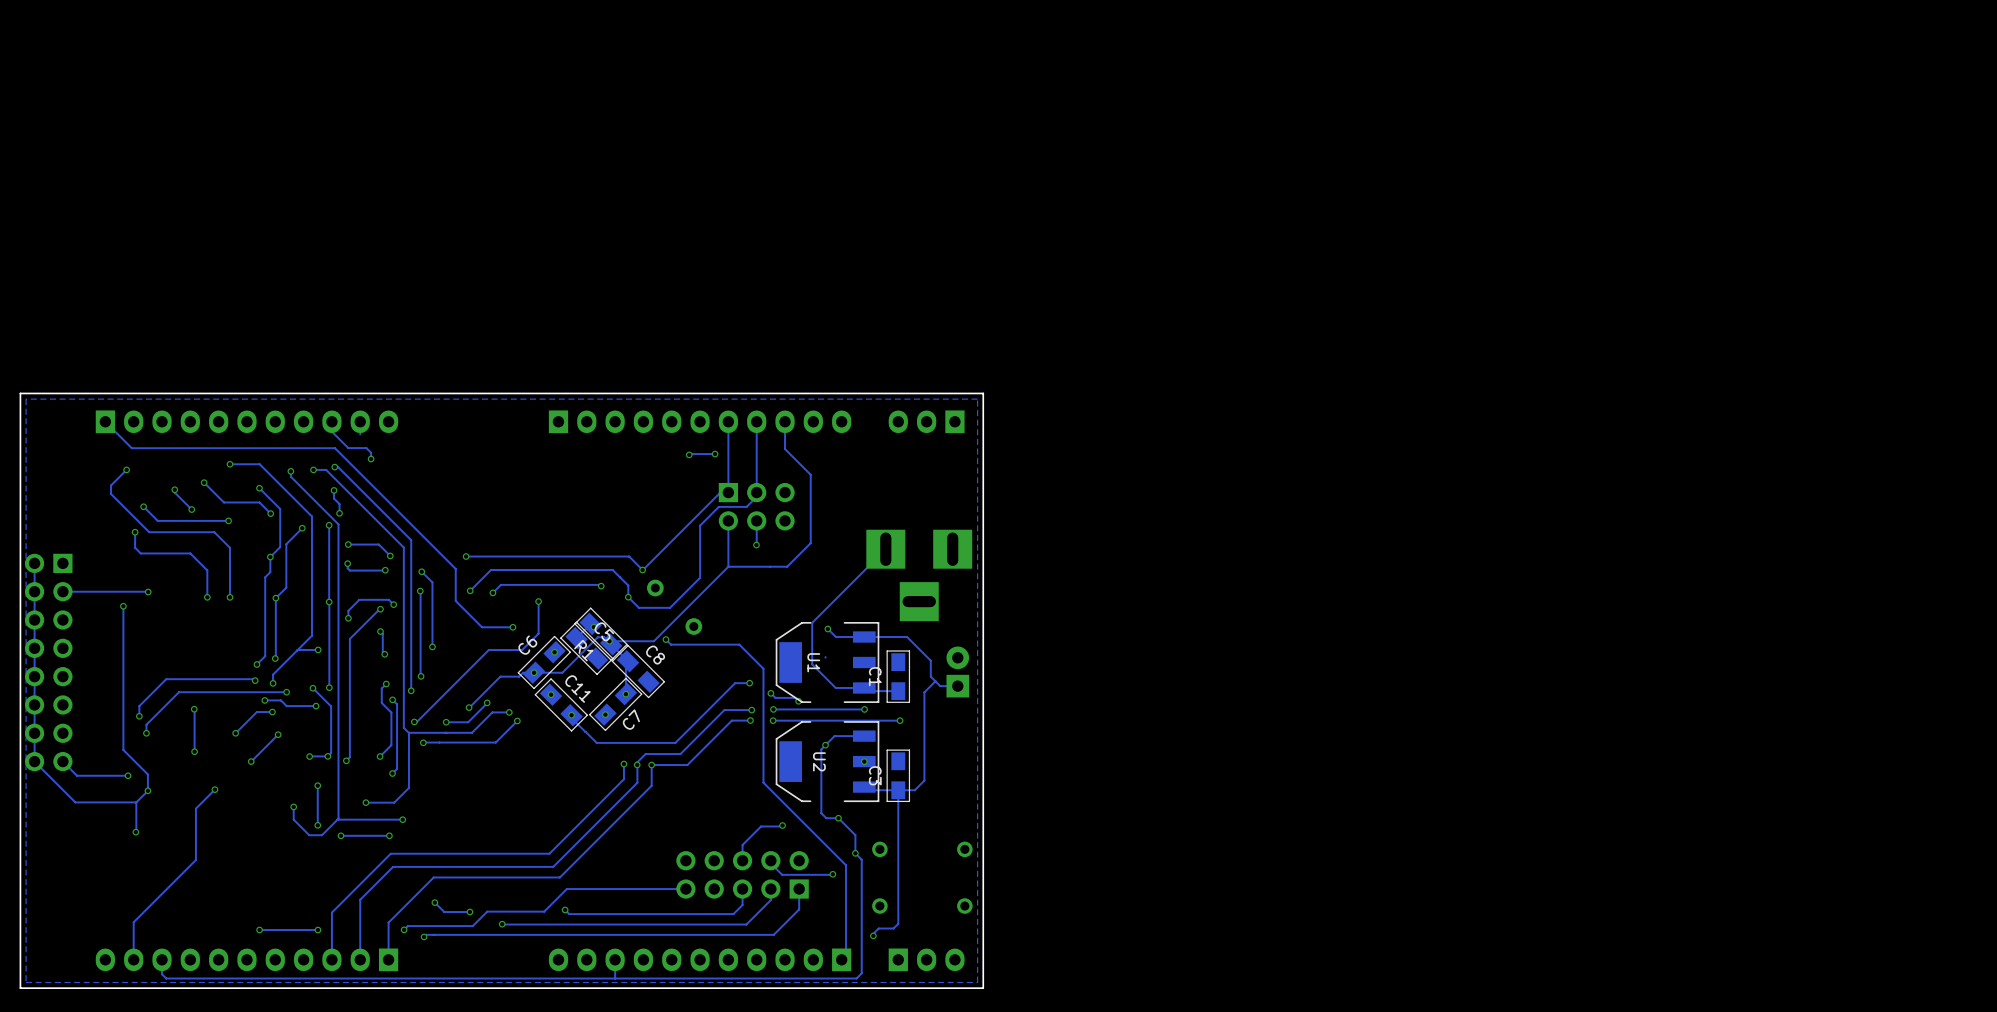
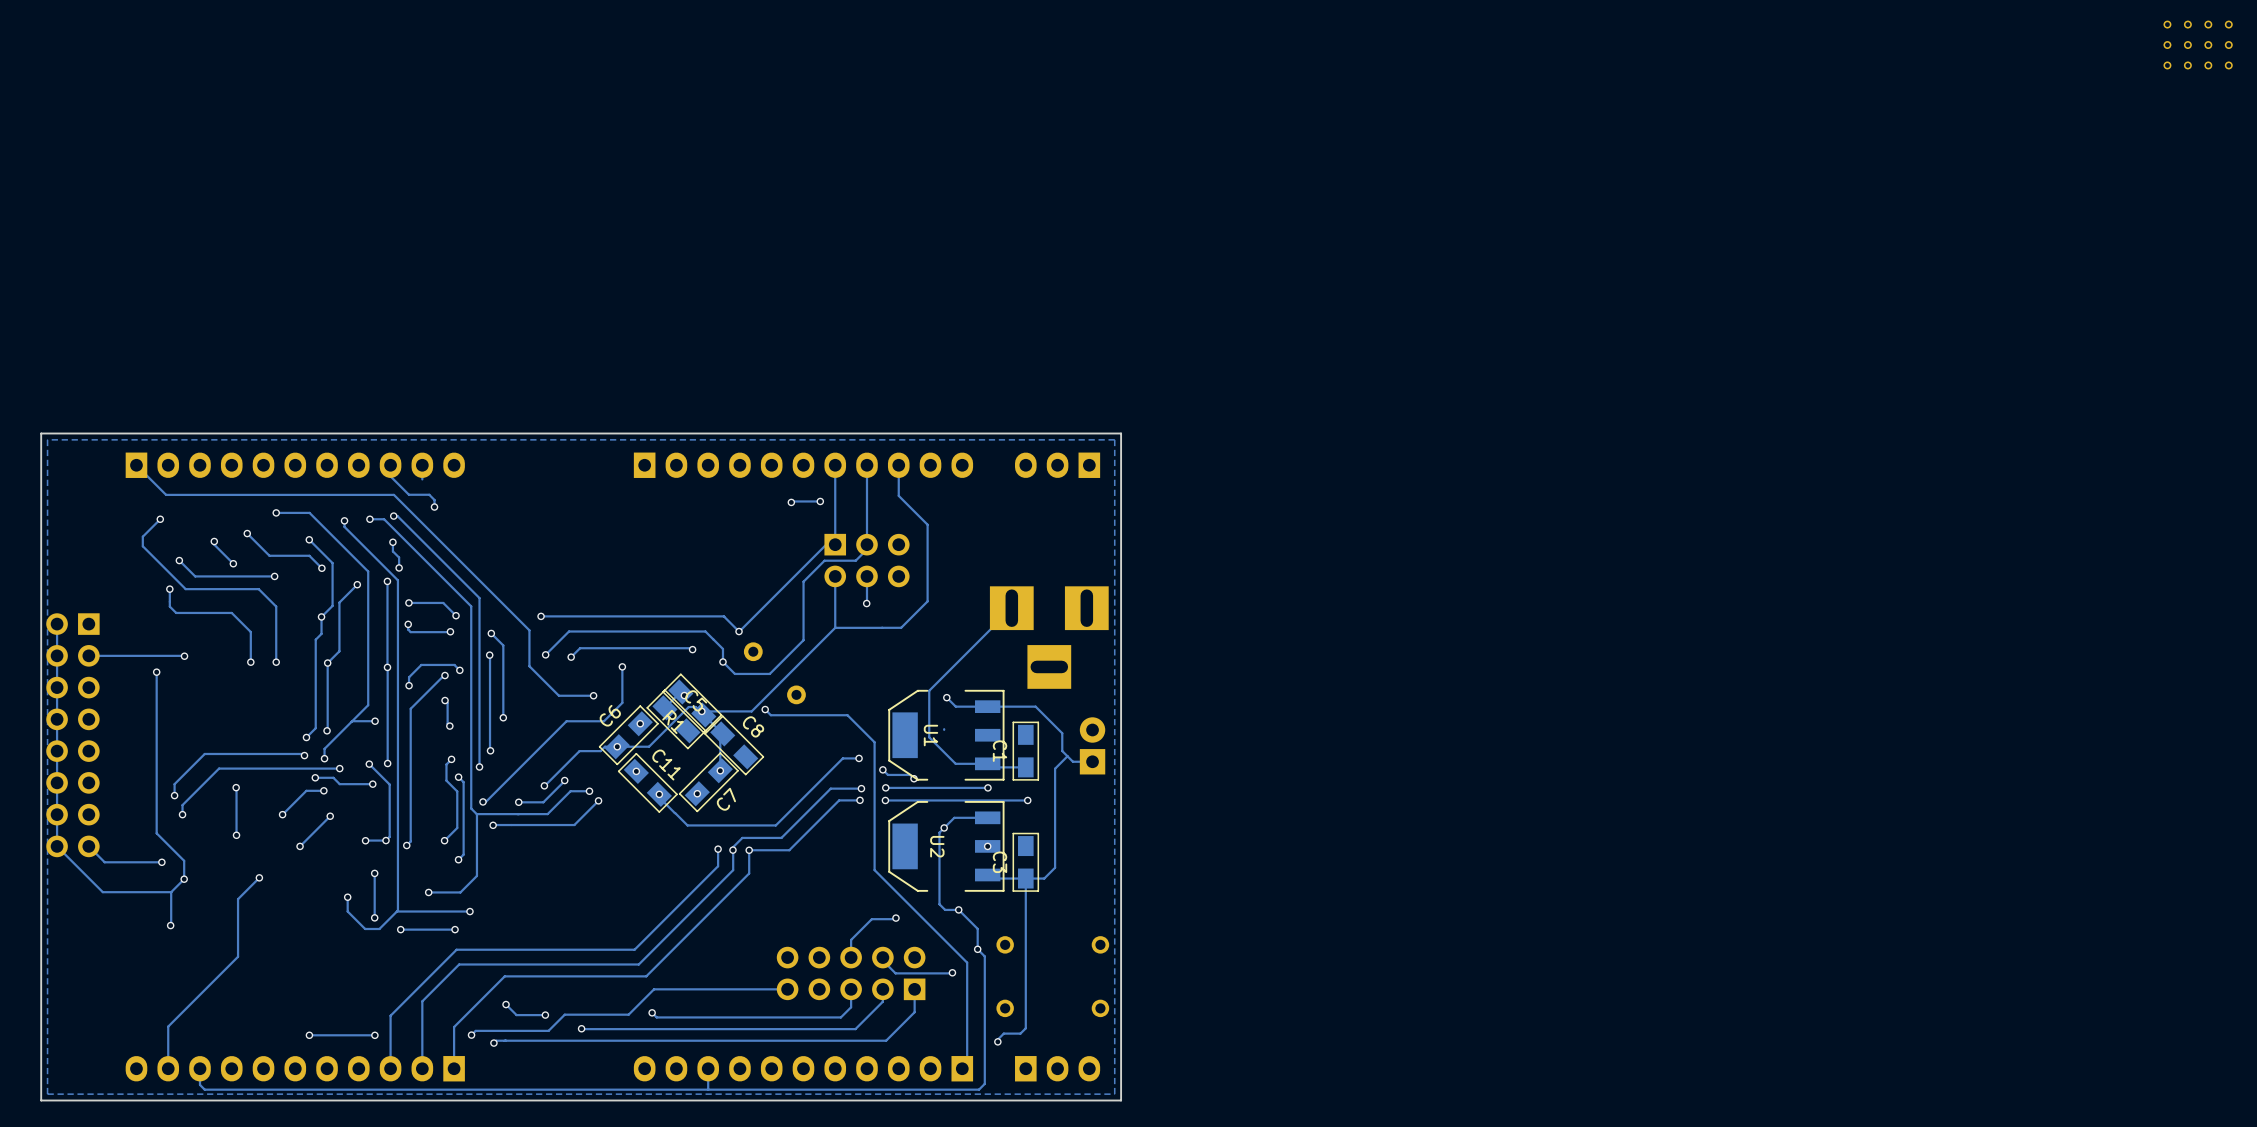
part: none -> (2167, 24)
part: none -> (2187, 24)
part: none -> (2208, 24)
part: none -> (2228, 24)
part: none -> (2167, 45)
part: none -> (2187, 45)
part: none -> (2208, 45)
part: none -> (2228, 45)
part: none -> (2167, 65)
part: none -> (2187, 65)
part: none -> (2208, 65)
part: none -> (2228, 65)

